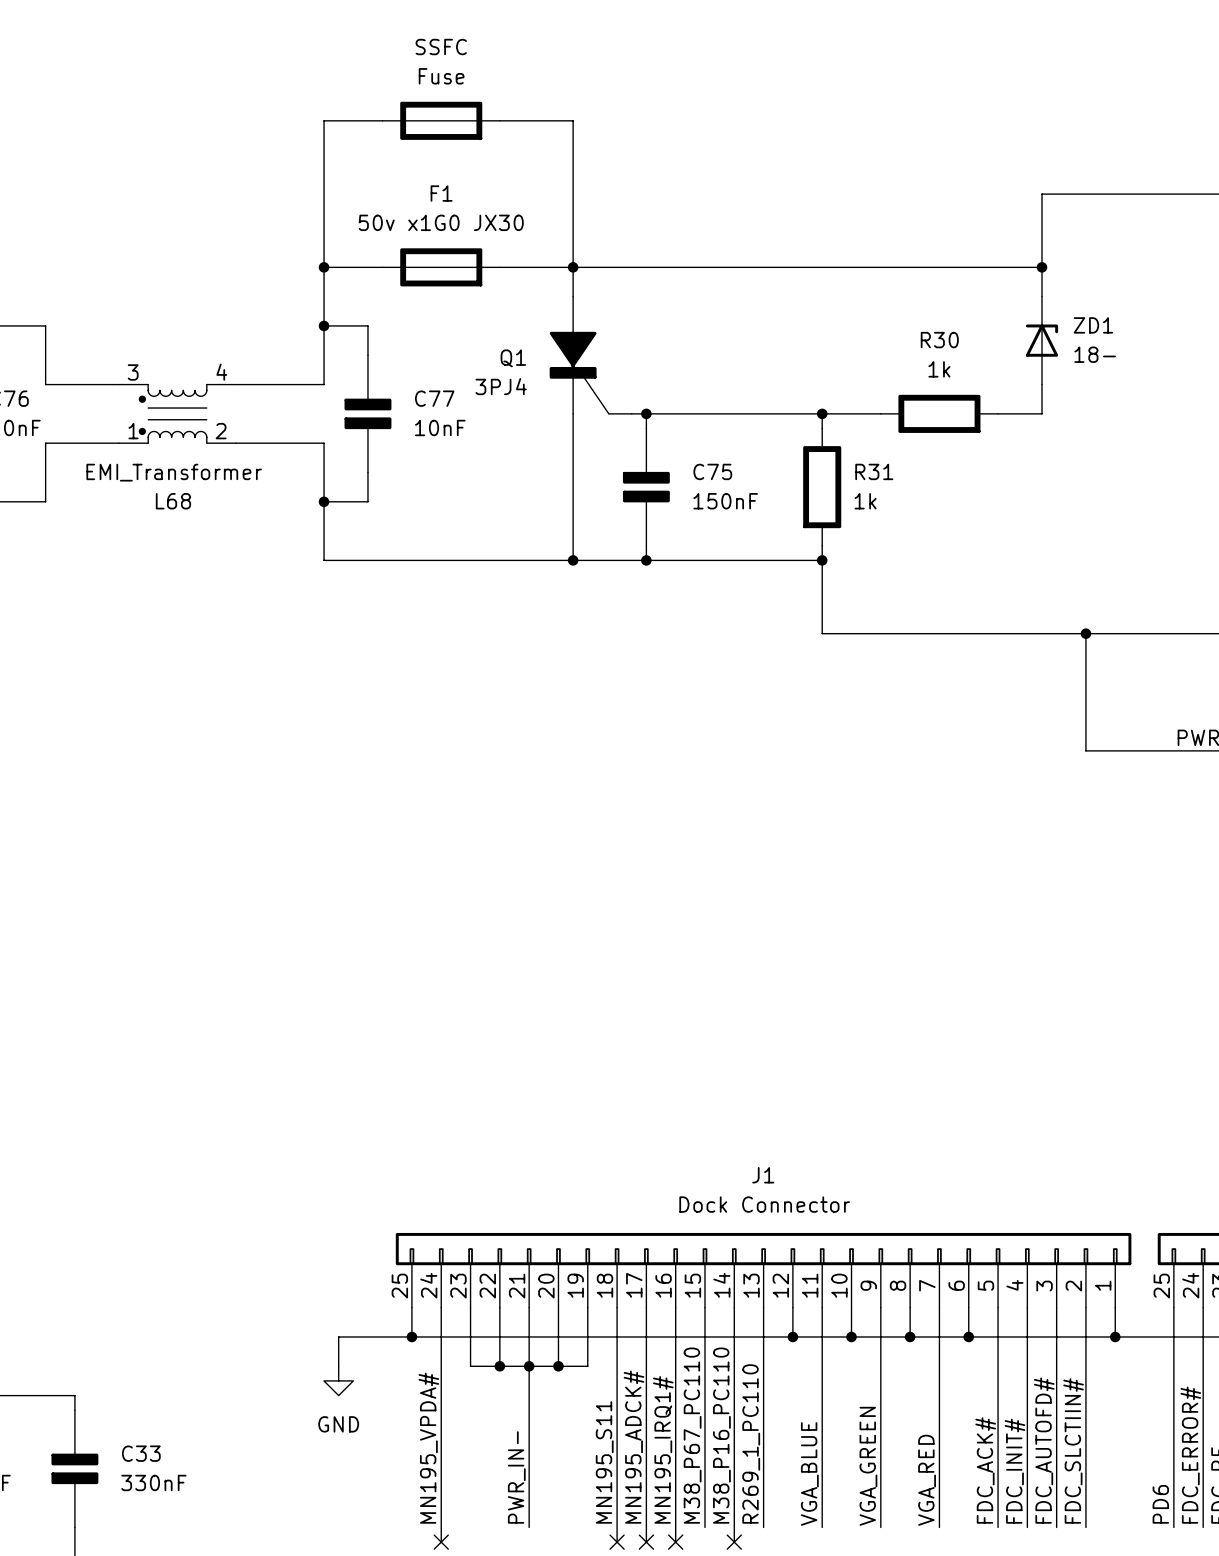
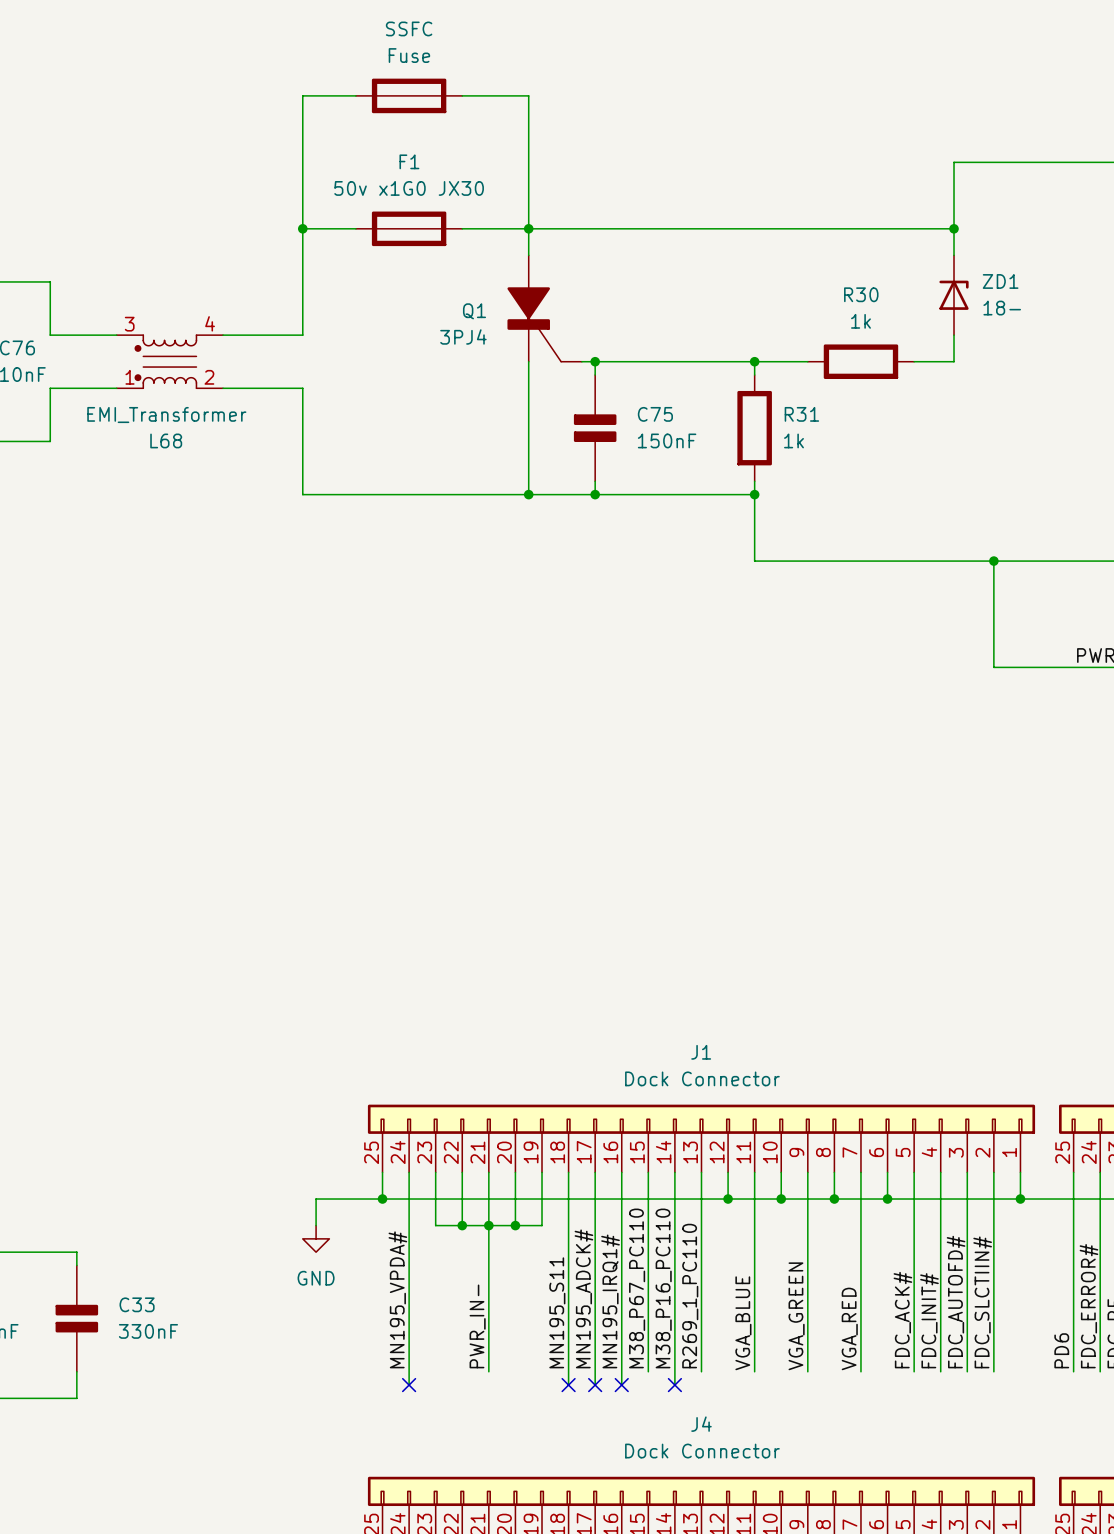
wire: (324, 325) (367, 325) (367, 355) -> none
junction: (324, 325) -> none
C77: 10nF (367, 413) -> none
wire: (367, 472) (367, 501) (324, 501) -> none
junction: (324, 501) -> none

